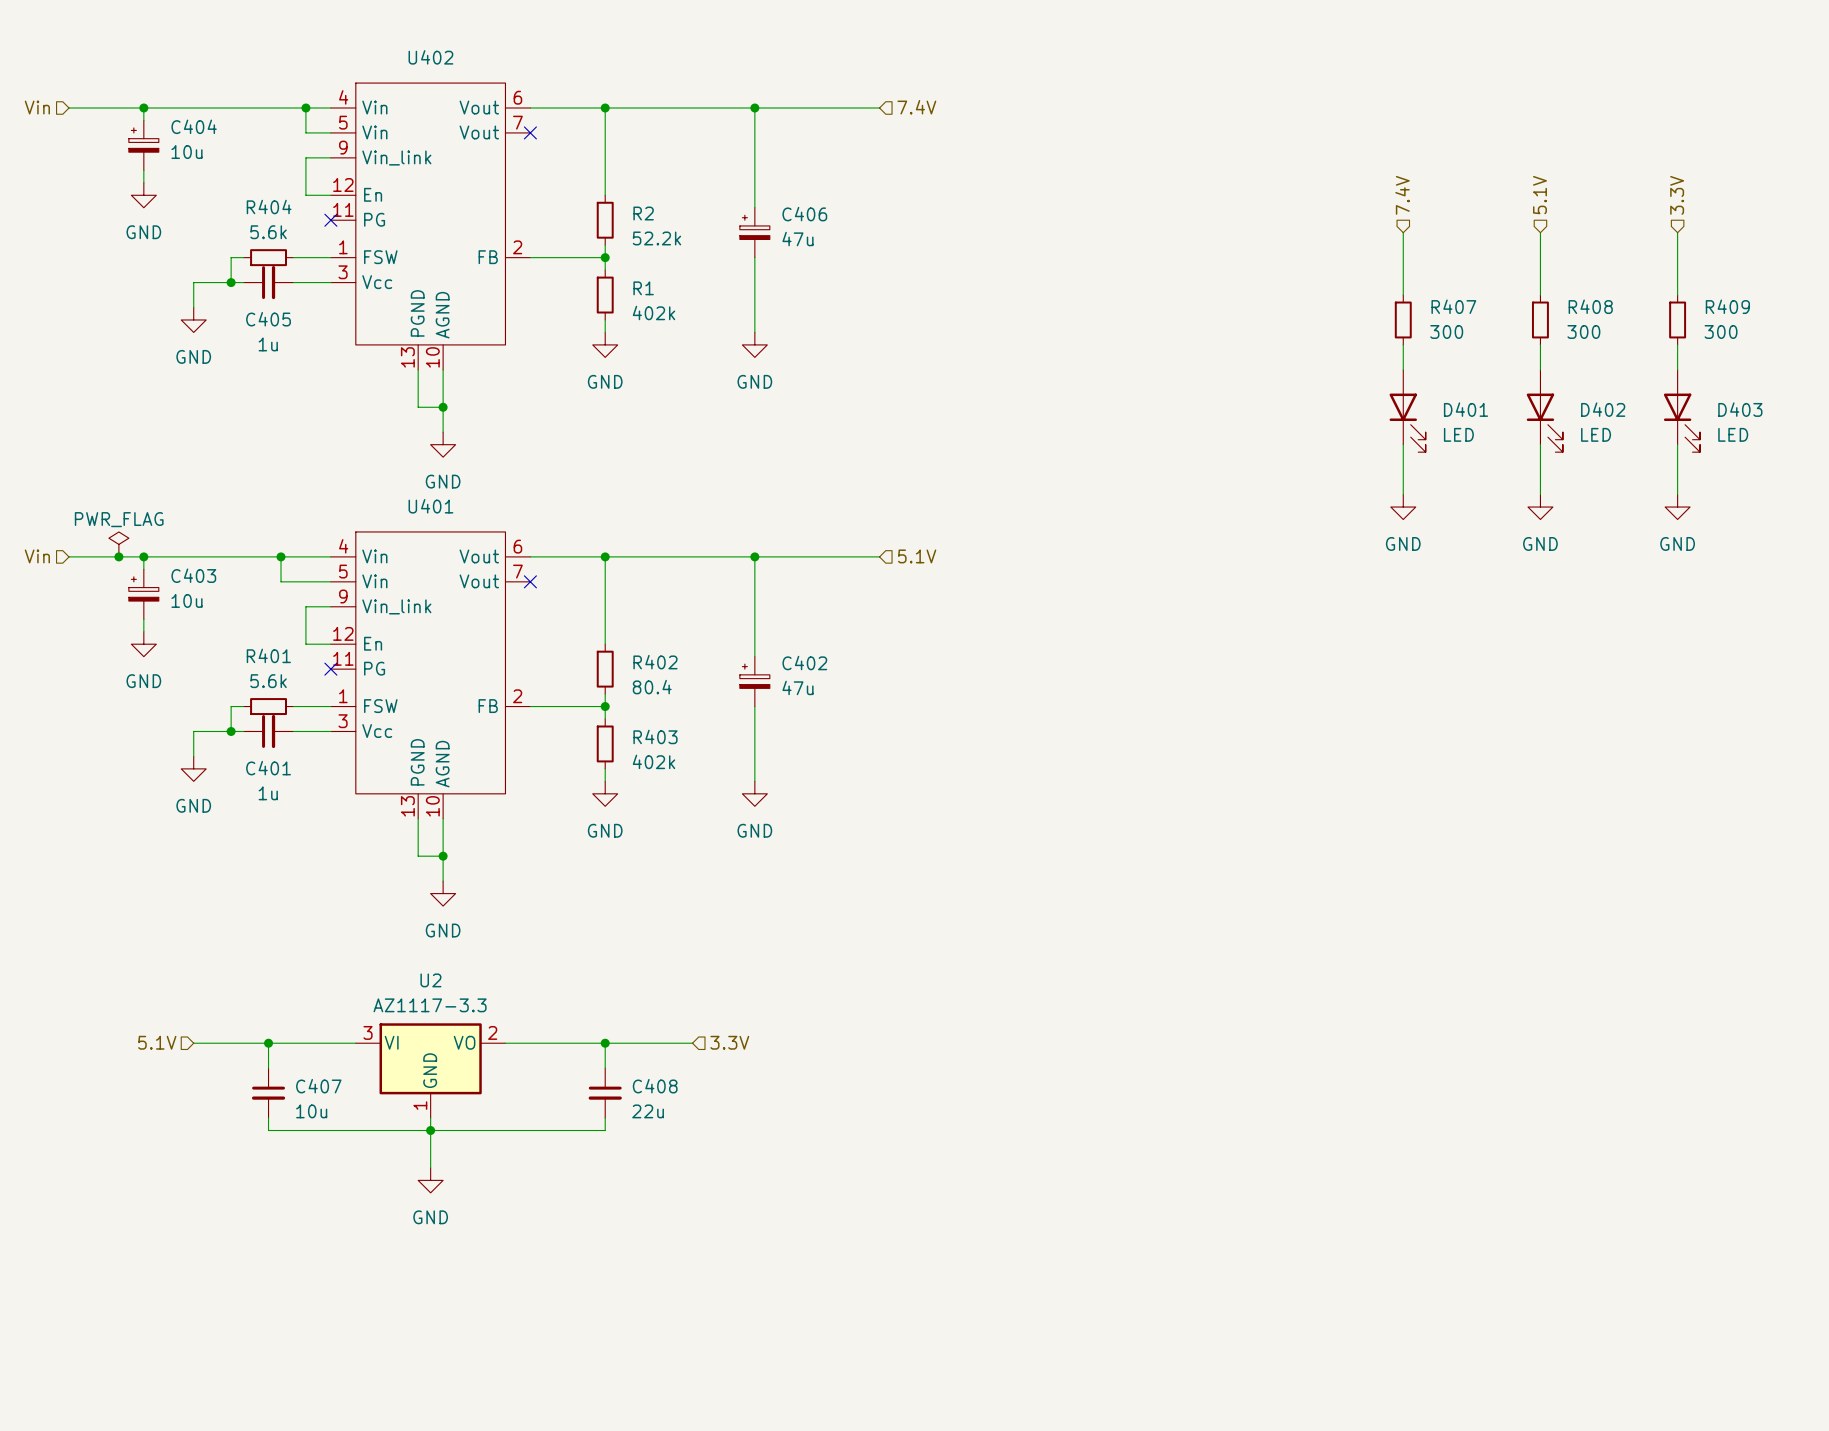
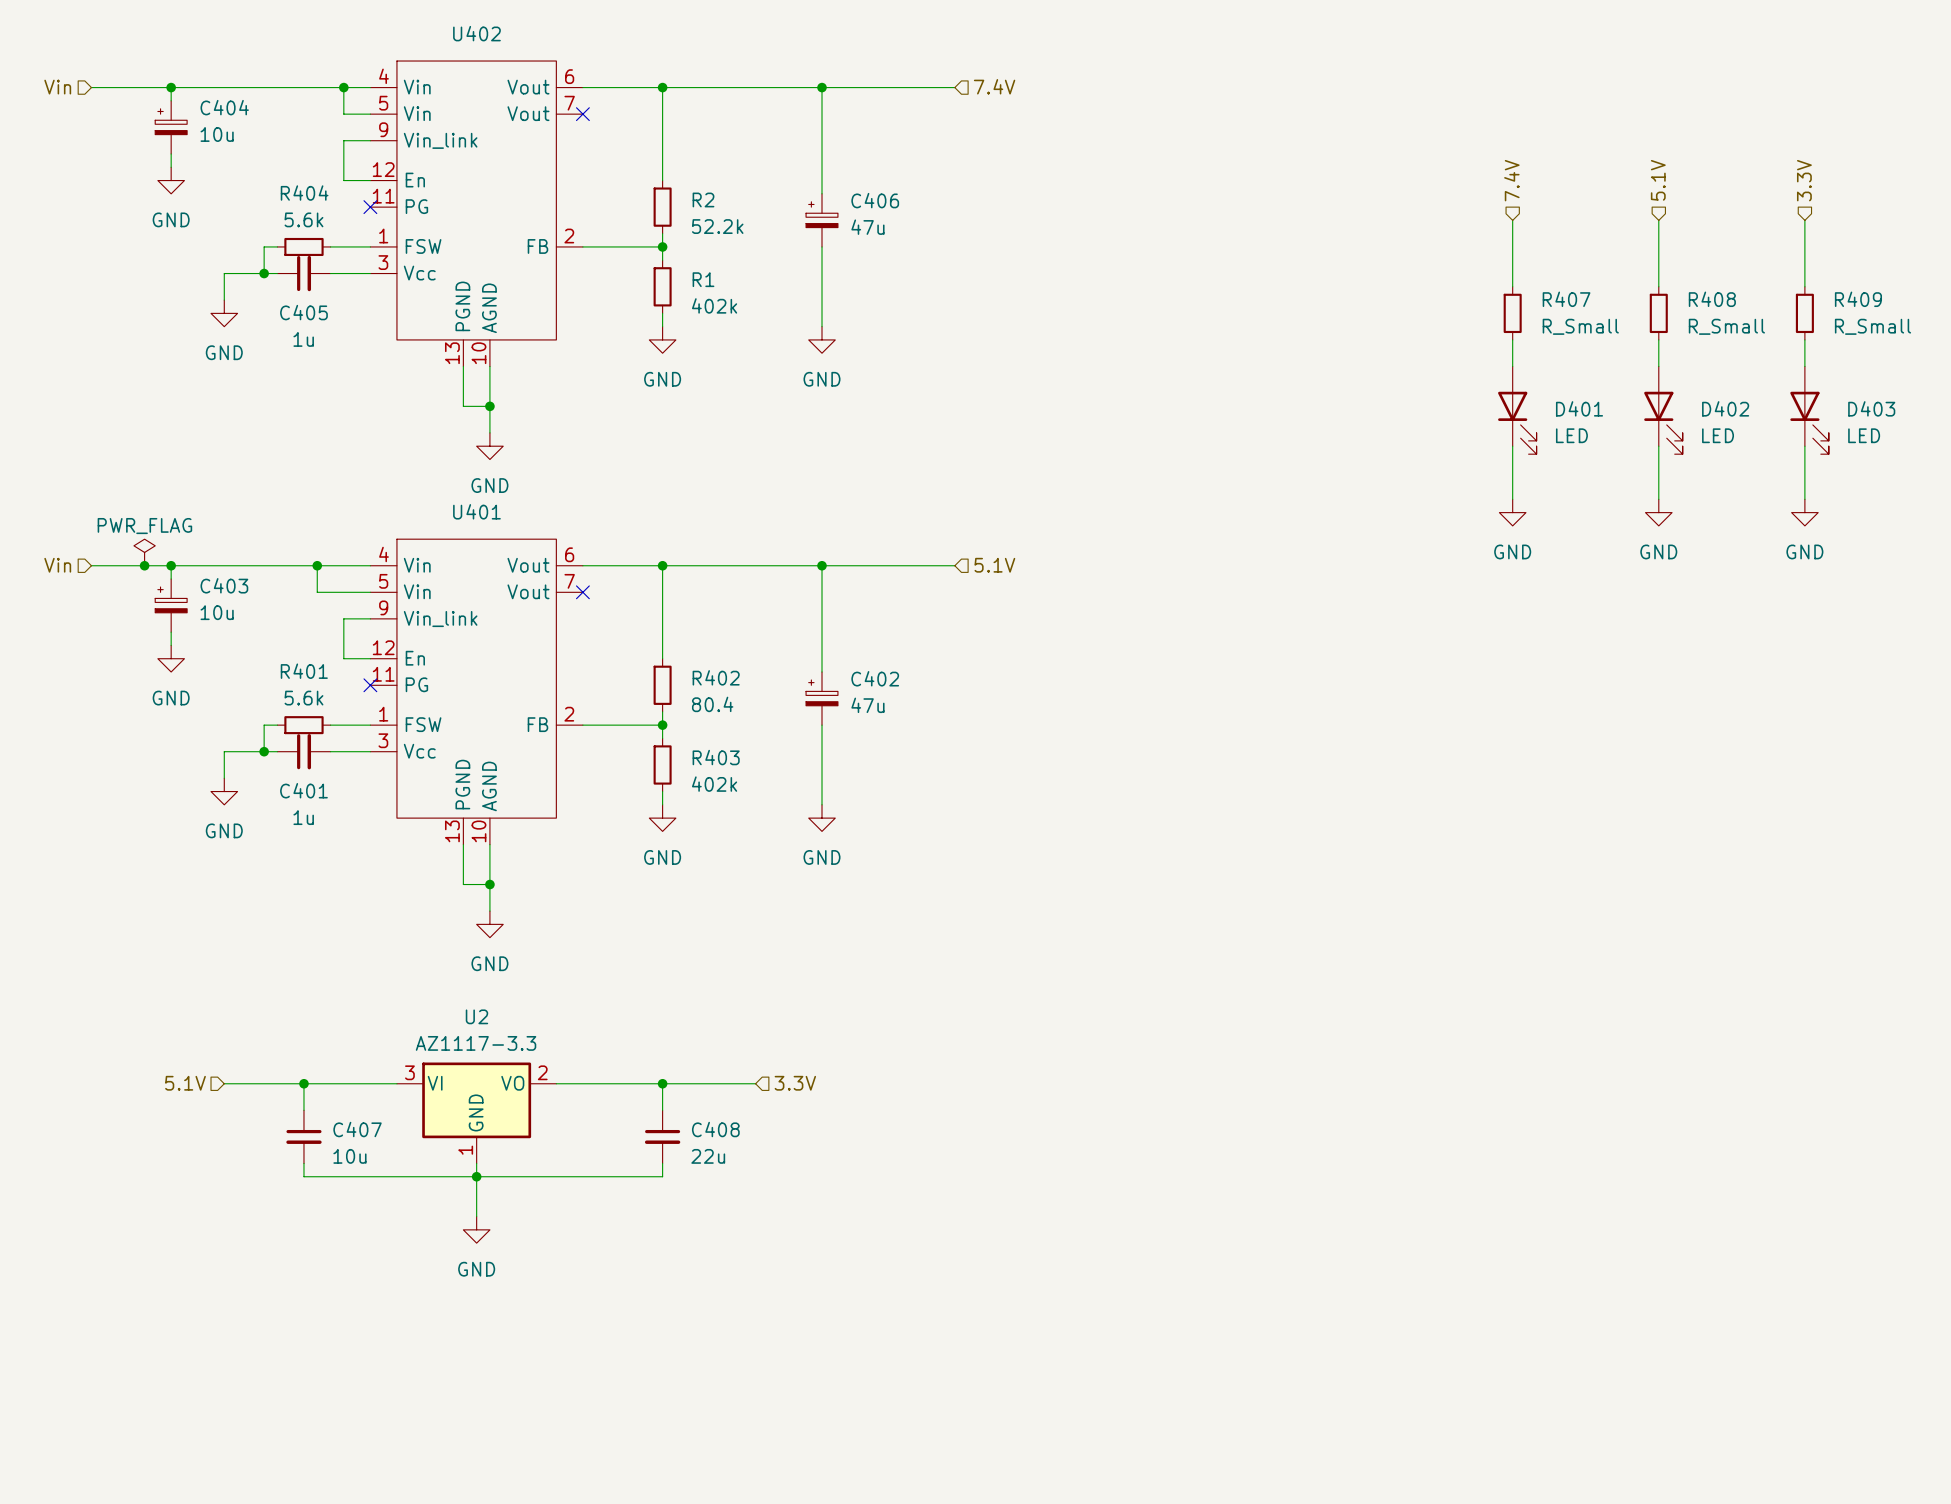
R407 value: 300 (1446, 331) -> R_Small (1580, 326)
R408 value: 300 (1583, 331) -> R_Small (1726, 326)
R409 value: 300 (1721, 331) -> R_Small (1872, 326)

